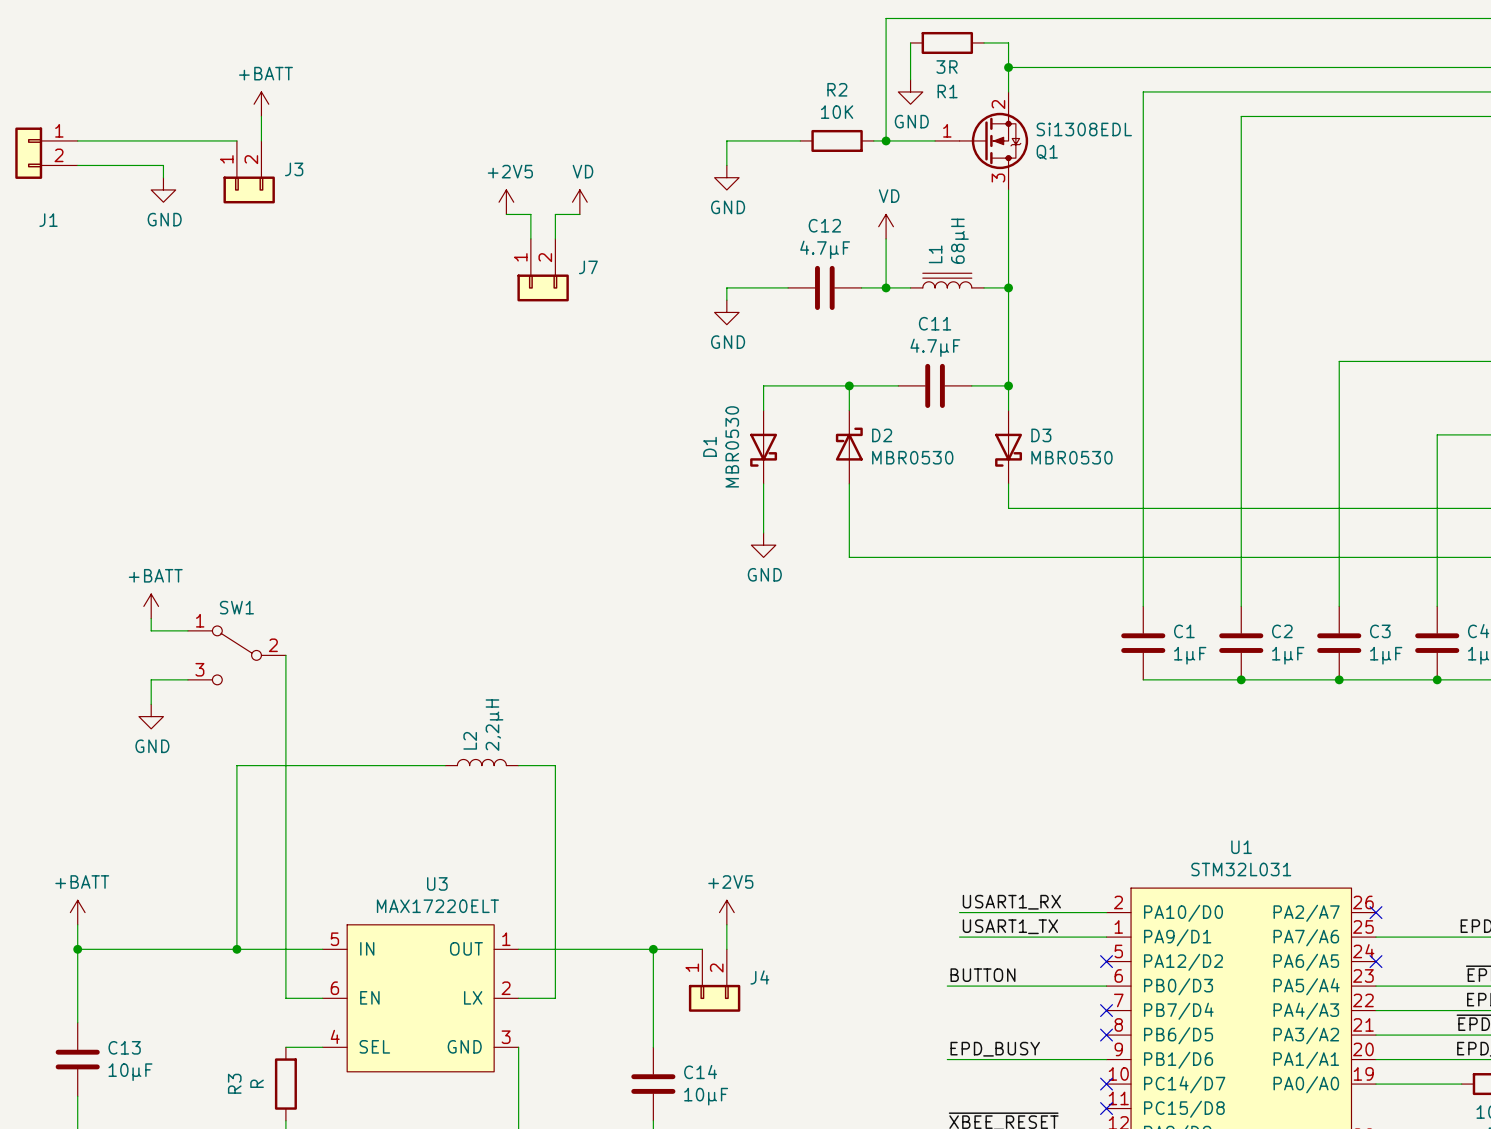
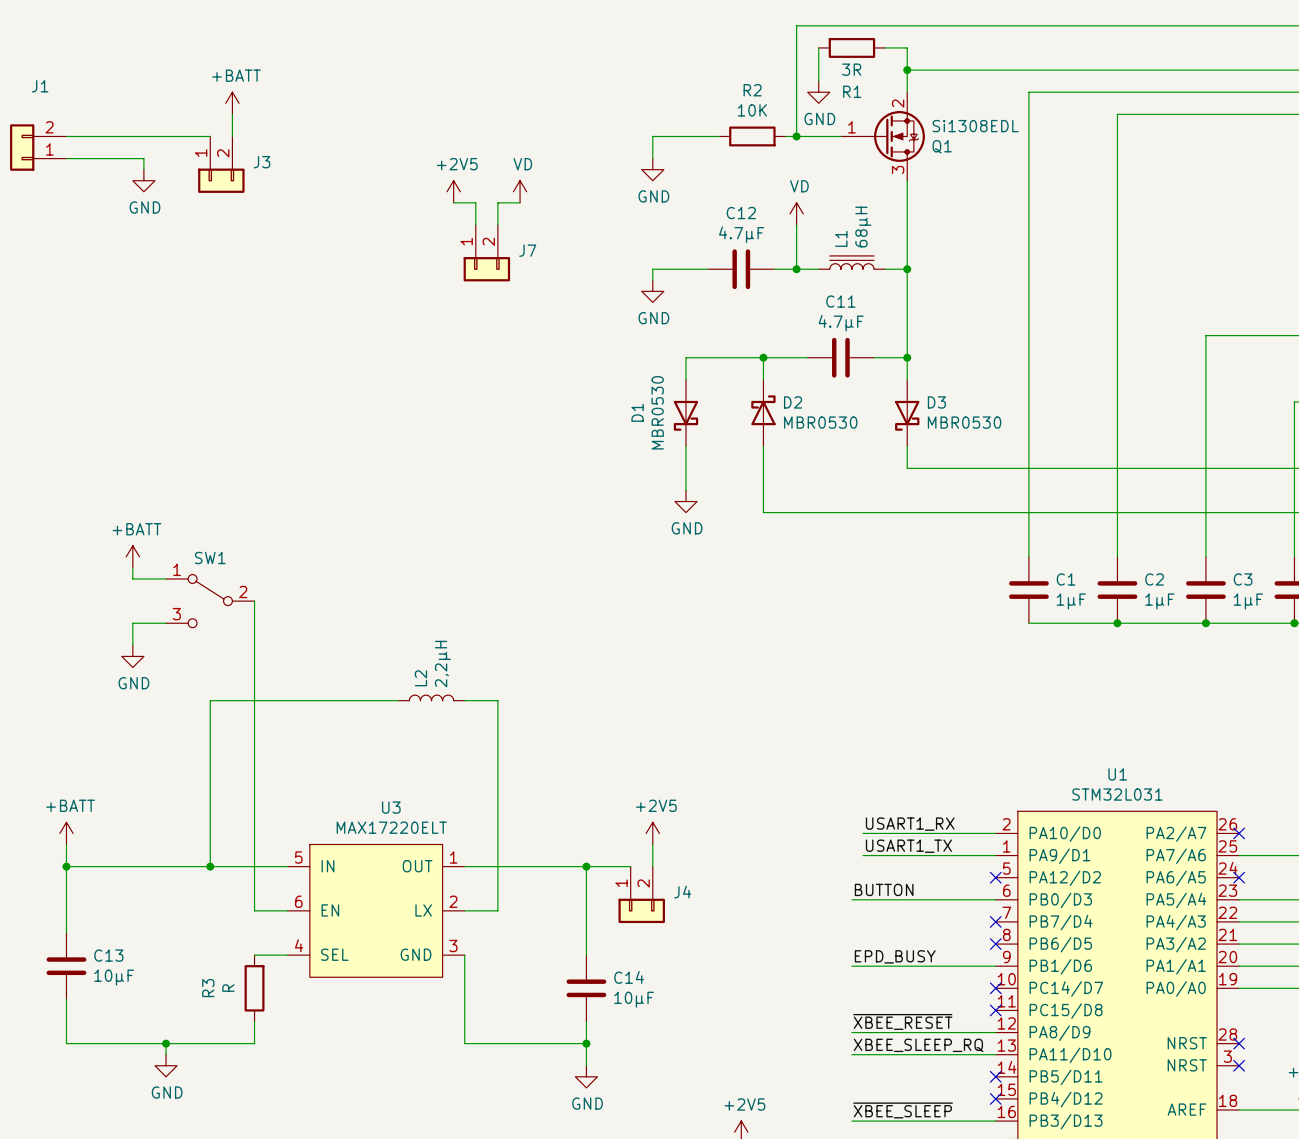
J1 flip: as is (28, 153) -> up-down (22, 147)

